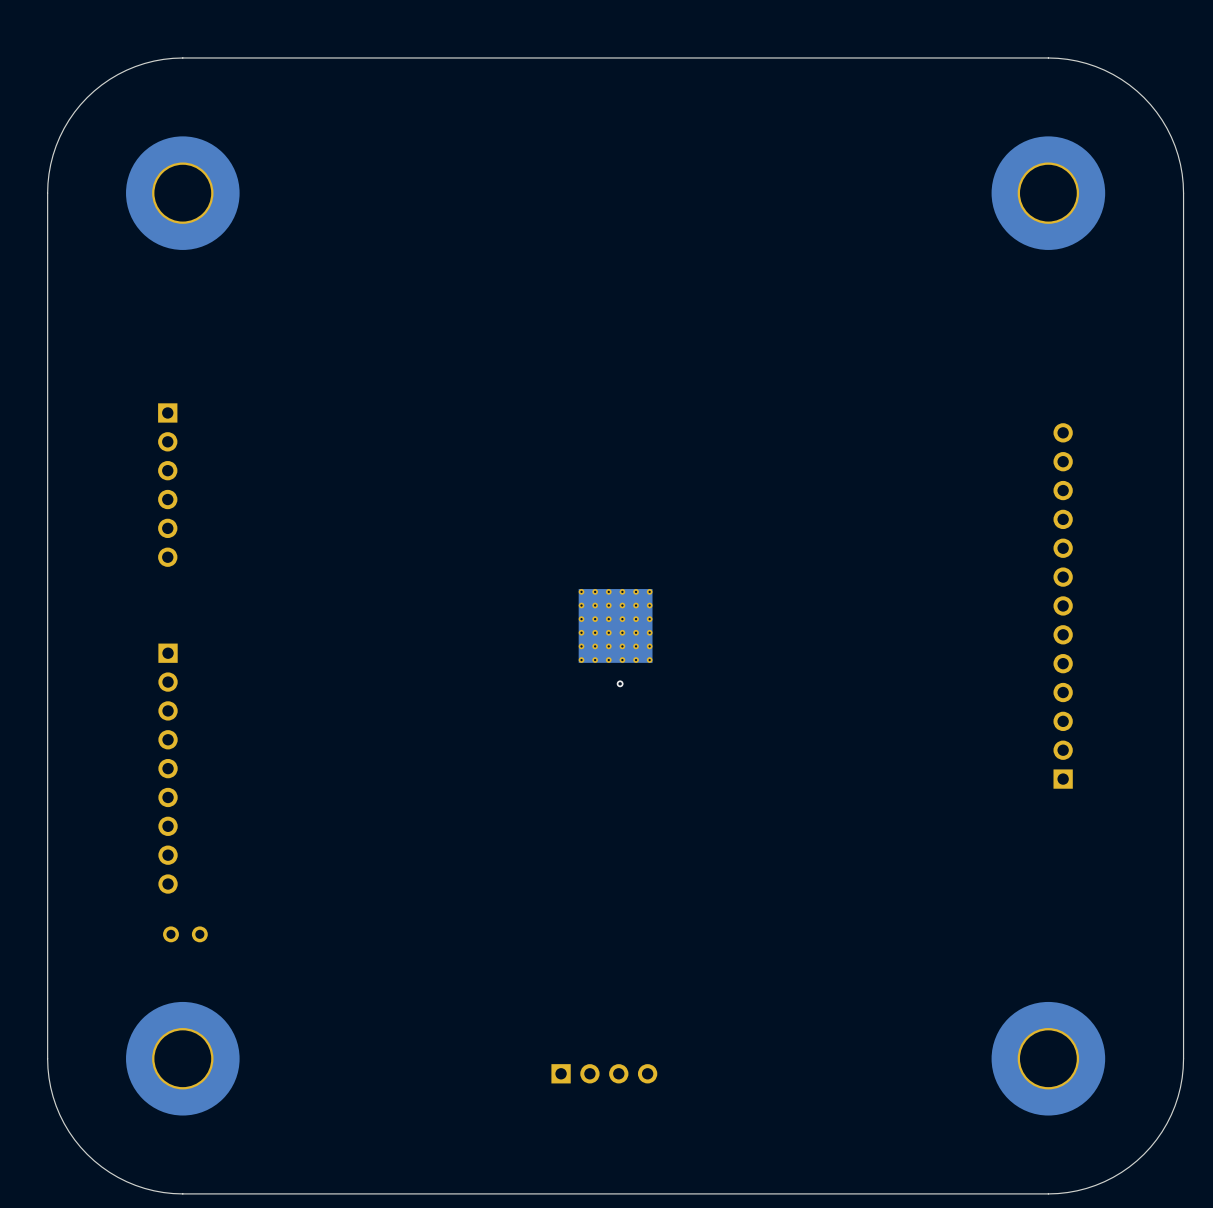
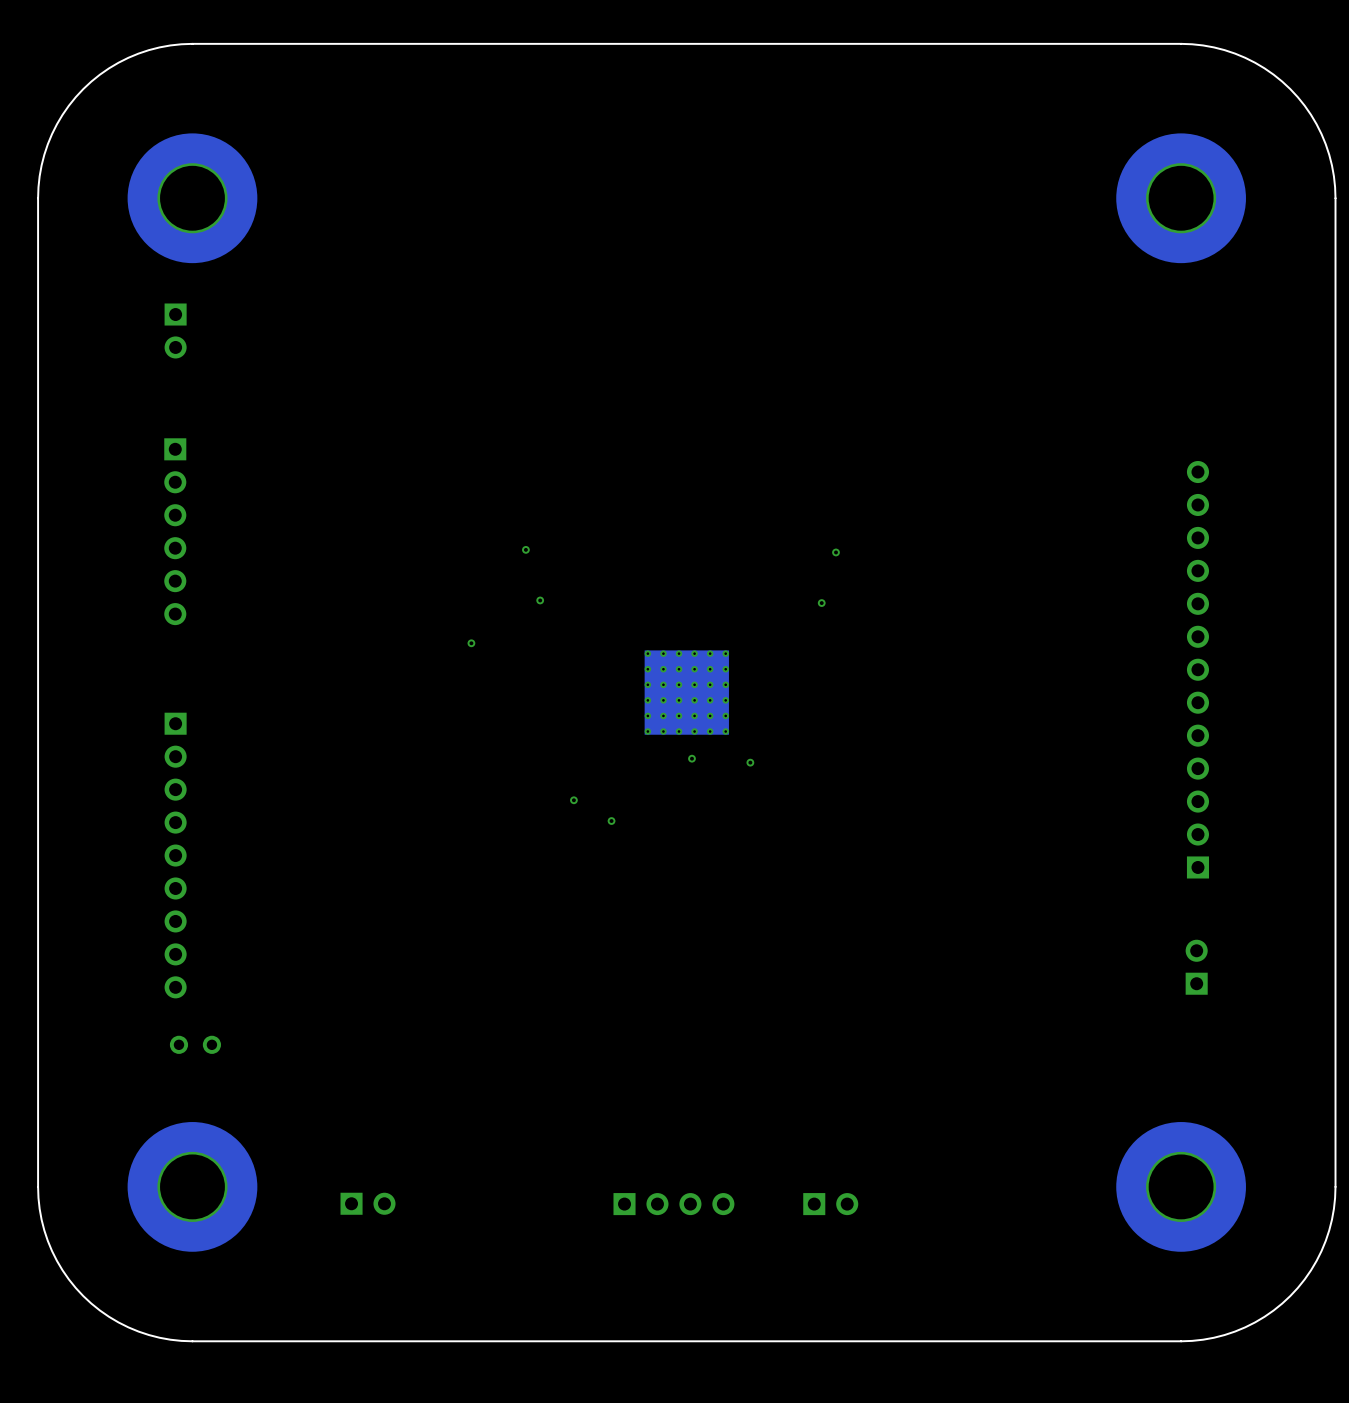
part: none -> (175, 330)
via: none -> (525, 549)
via: none -> (835, 552)
via: none -> (540, 600)
via: none -> (821, 603)
via: none -> (471, 643)
via: none -> (750, 762)
via: none -> (573, 800)
via: none -> (611, 821)
part: none -> (1196, 967)
part: none -> (368, 1203)
part: none -> (830, 1204)

